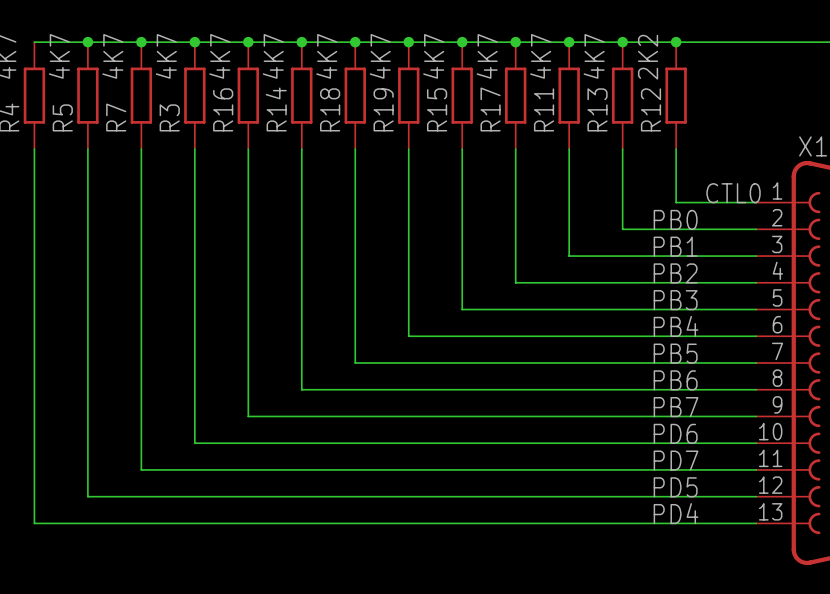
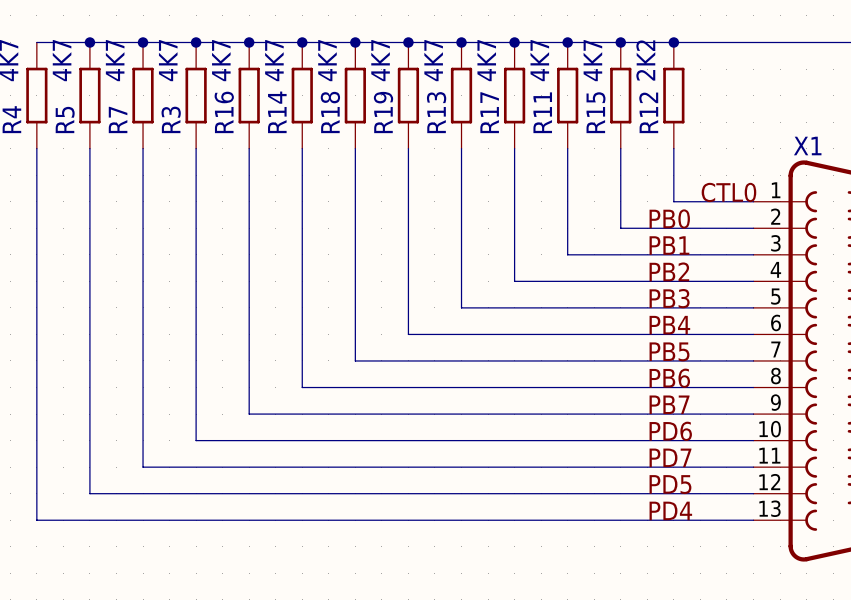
R15 name: R15 (437, 109) -> R13 (436, 112)
R13 name: R13 (597, 109) -> R15 (595, 112)

